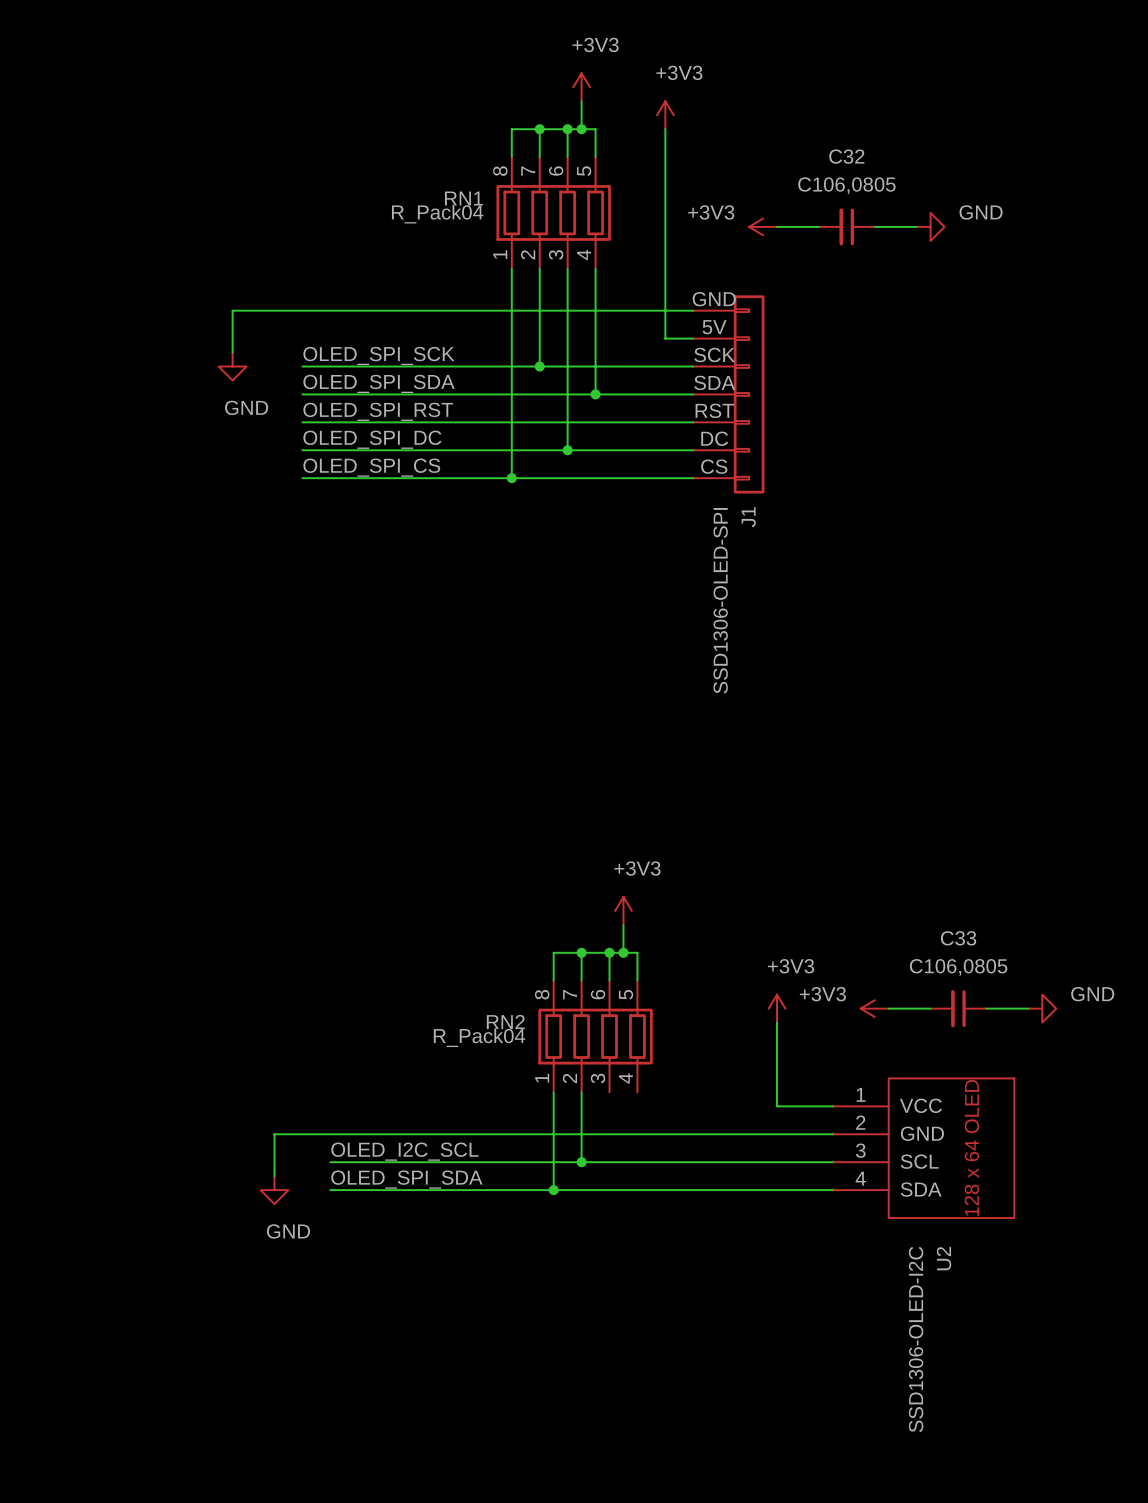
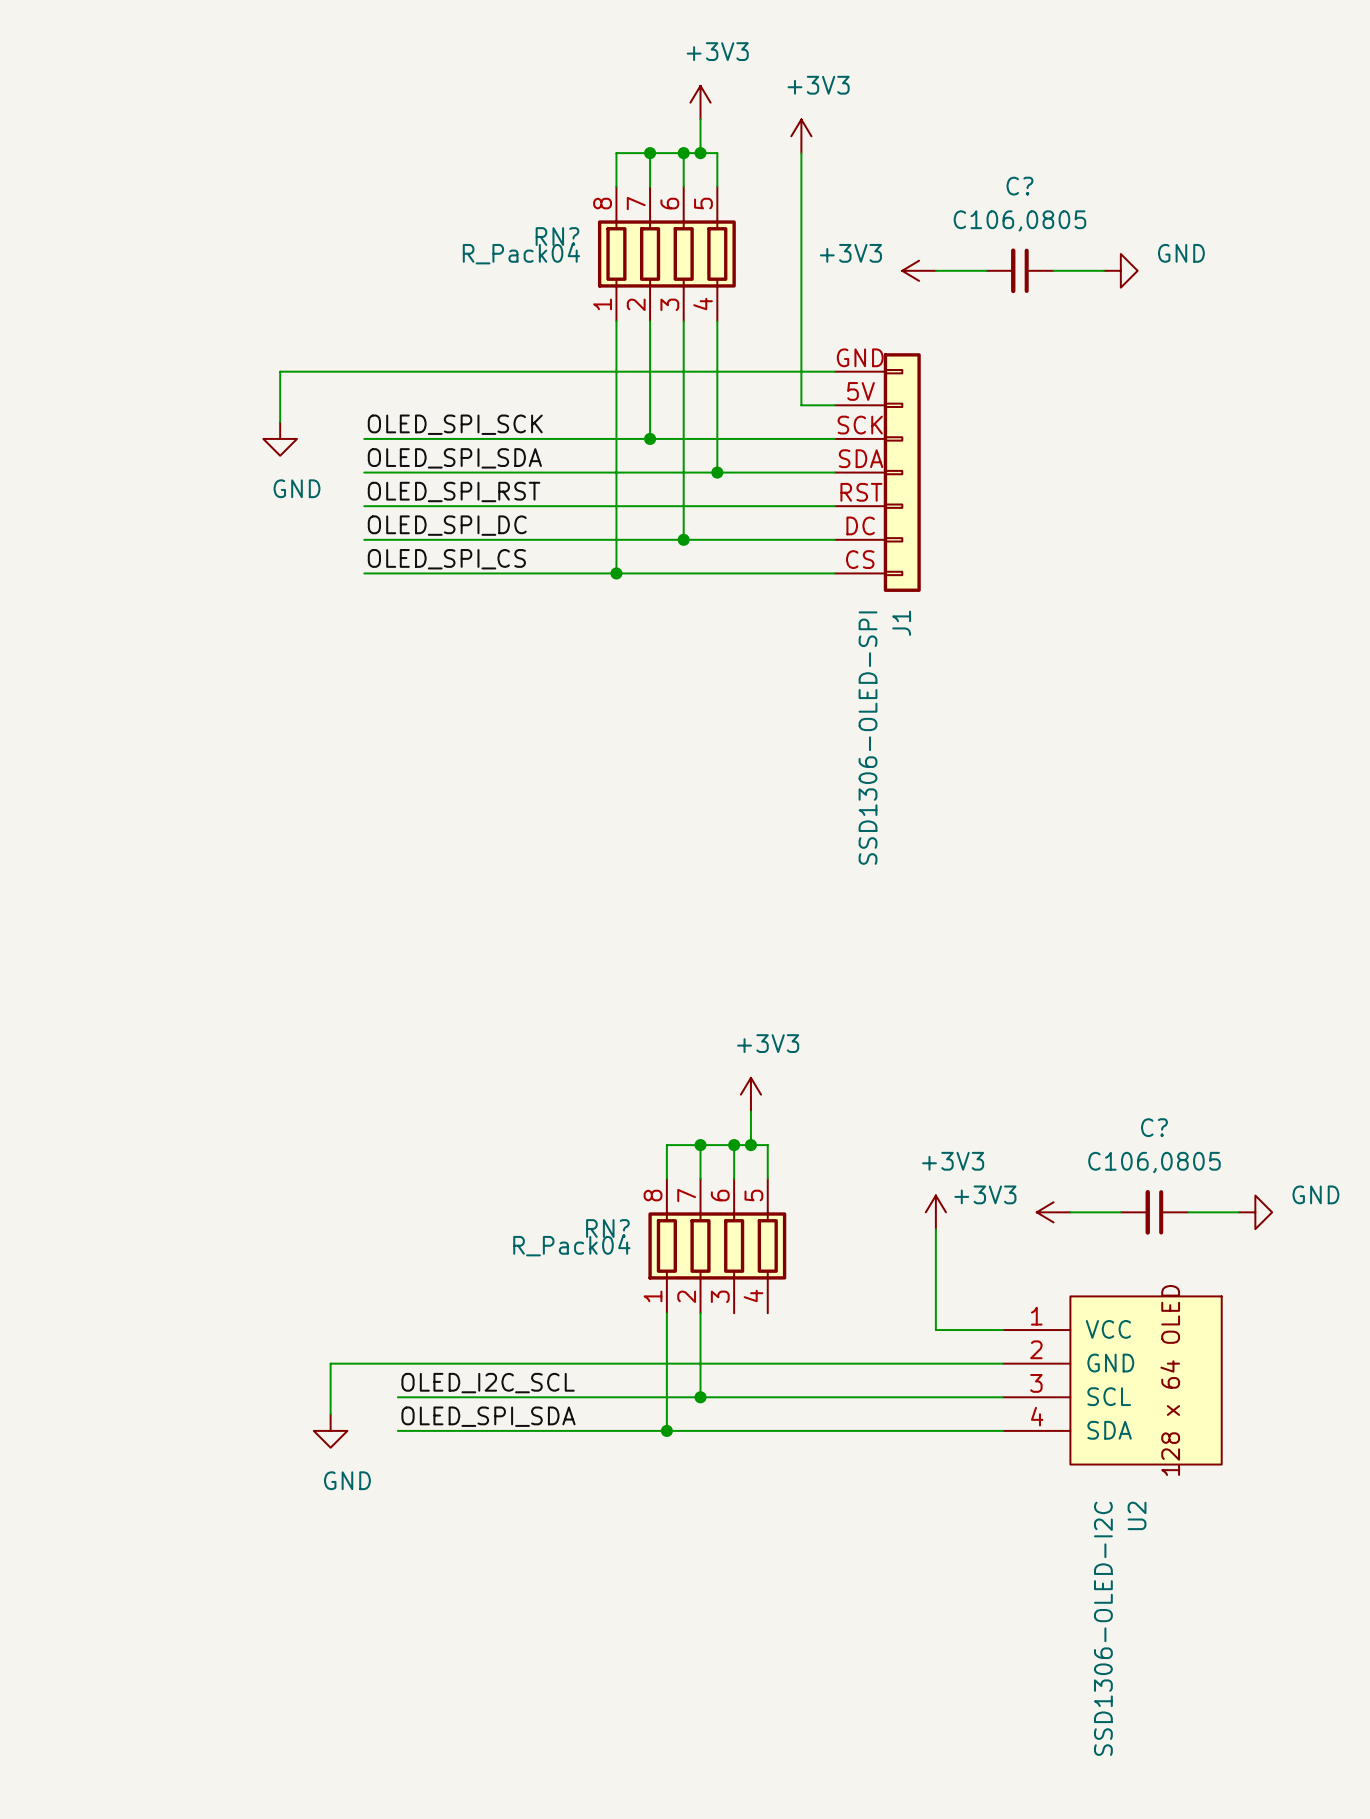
C32 name: C32 (846, 156) -> C? (1019, 186)
RN1 name: RN1 (463, 198) -> RN? (557, 236)
C33 name: C33 (958, 938) -> C? (1154, 1127)
RN2 name: RN2 (505, 1021) -> RN? (607, 1228)

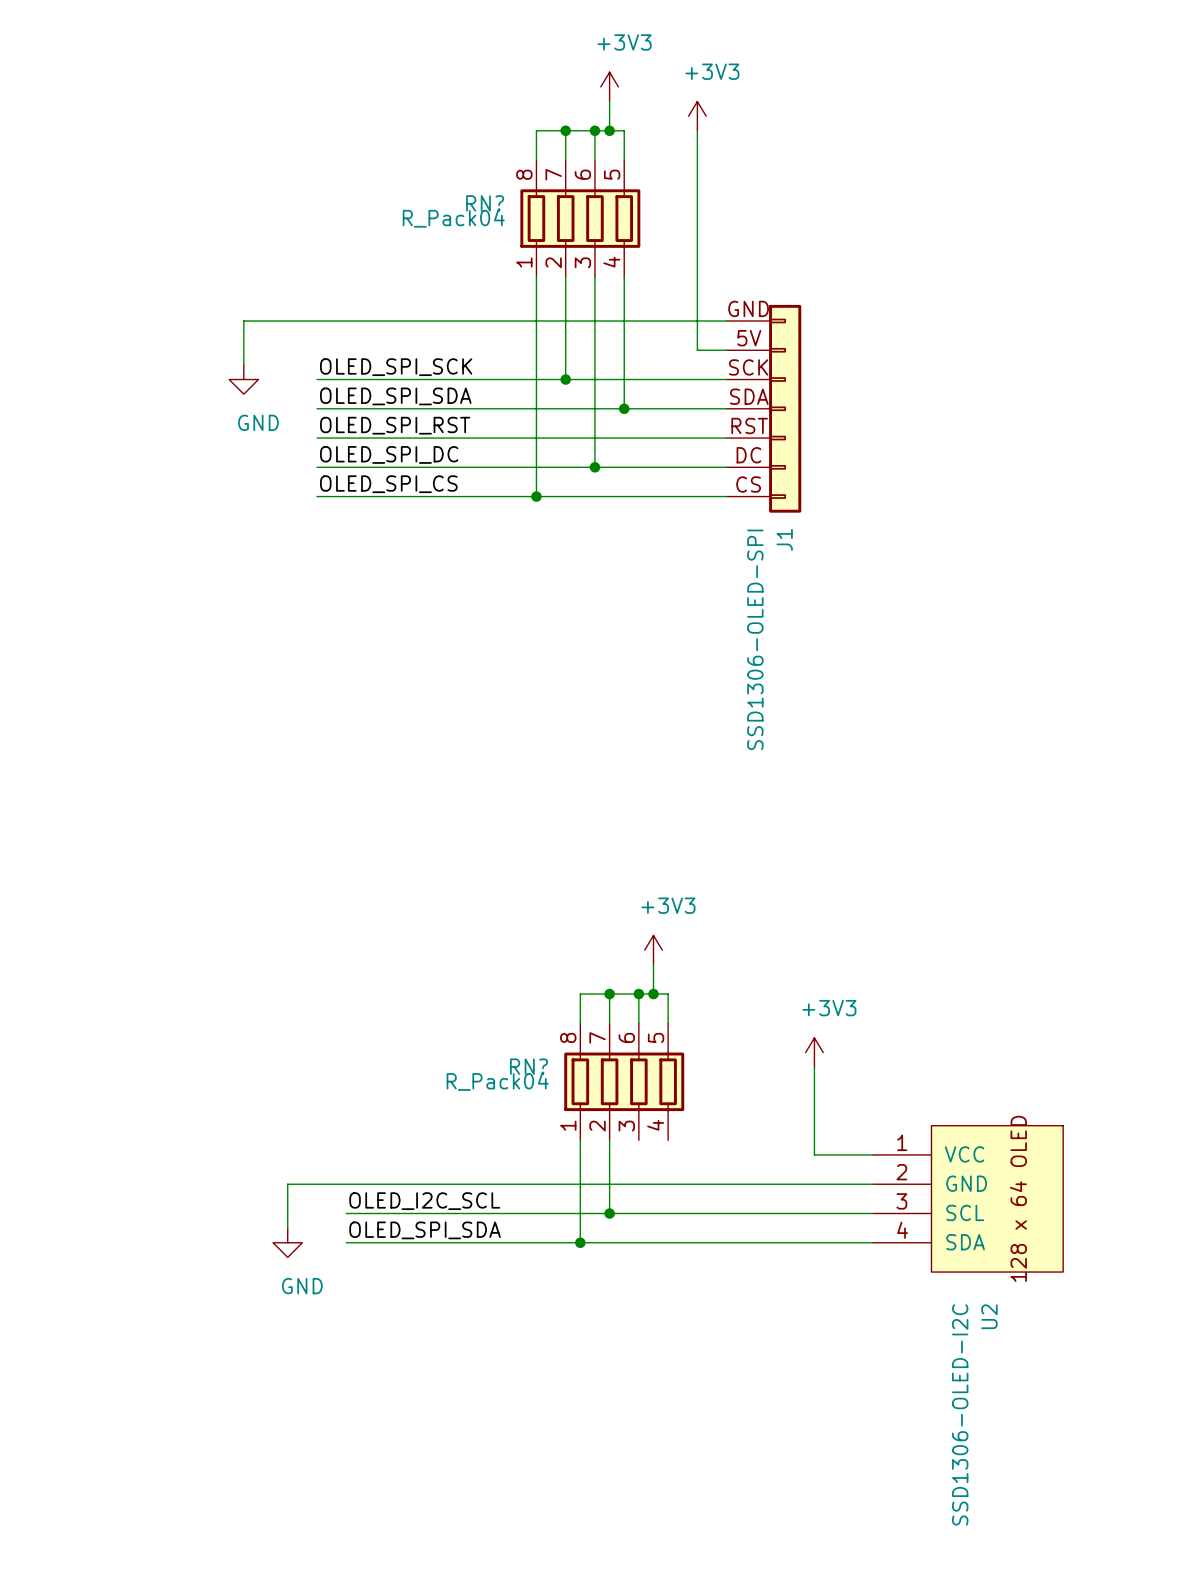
power symbol: +3V3 (919, 270) -> none
wire: (935, 270) (986, 270) -> none
C?: C106,0805 (1019, 270) -> none
wire: (1053, 270) (1104, 270) -> none
power symbol: GND (1120, 270) -> none
power symbol: +3V3 (1053, 1212) -> none
wire: (1070, 1212) (1120, 1212) -> none
C?: C106,0805 (1154, 1212) -> none
wire: (1188, 1212) (1238, 1212) -> none
power symbol: GND (1255, 1212) -> none

